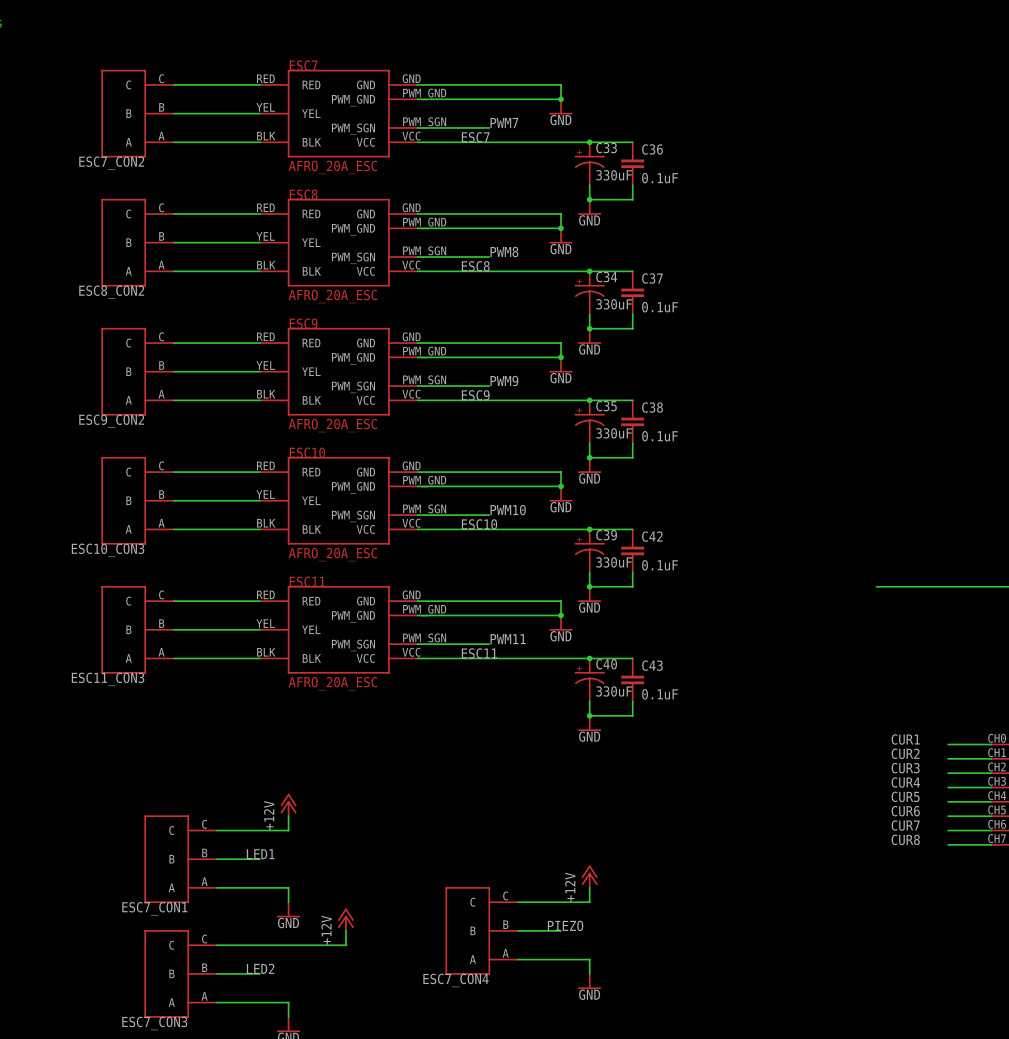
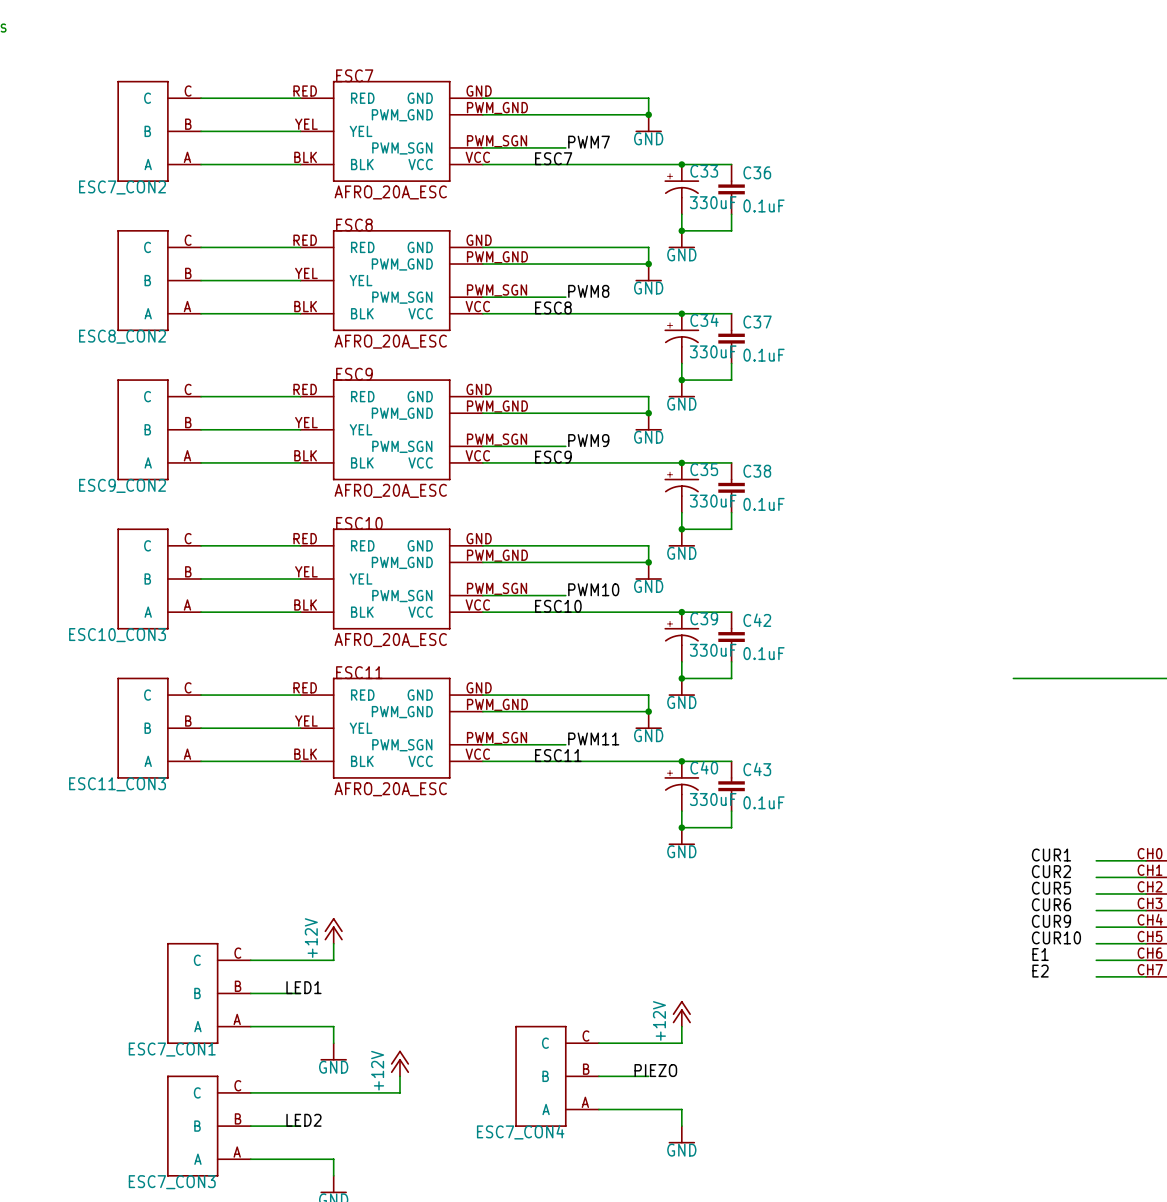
label: CUR3 (905, 768) -> CUR5 (1051, 888)
label: CUR4 (905, 782) -> CUR6 (1051, 904)
label: CUR5 (905, 796) -> CUR9 (1051, 921)
label: CUR6 (905, 811) -> CUR10 (1056, 937)
label: CUR7 (905, 825) -> E1 (1040, 954)
label: CUR8 (905, 839) -> E2 (1040, 971)

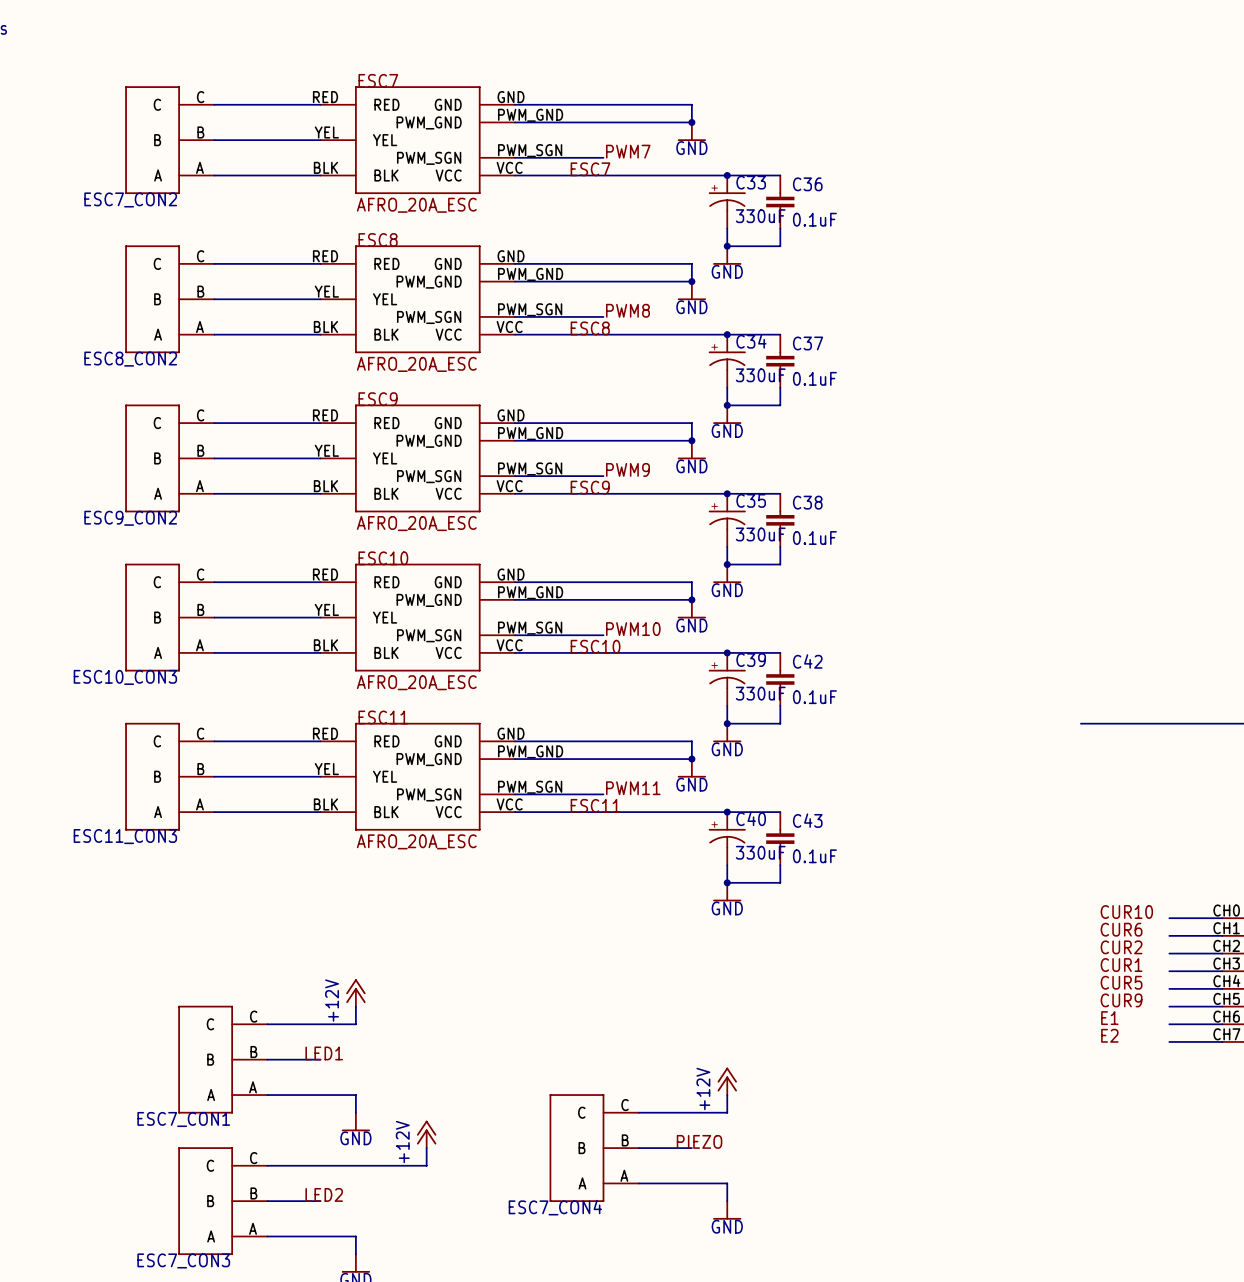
label: CUR1 (1051, 855) -> CUR10 (1126, 912)
label: CUR2 (1051, 871) -> CUR6 (1121, 929)
label: CUR5 (1051, 888) -> CUR2 (1121, 947)
label: CUR6 (1051, 904) -> CUR1 (1121, 965)
label: CUR9 (1051, 921) -> CUR5 (1121, 982)
label: CUR10 (1056, 937) -> CUR9 (1121, 1000)

